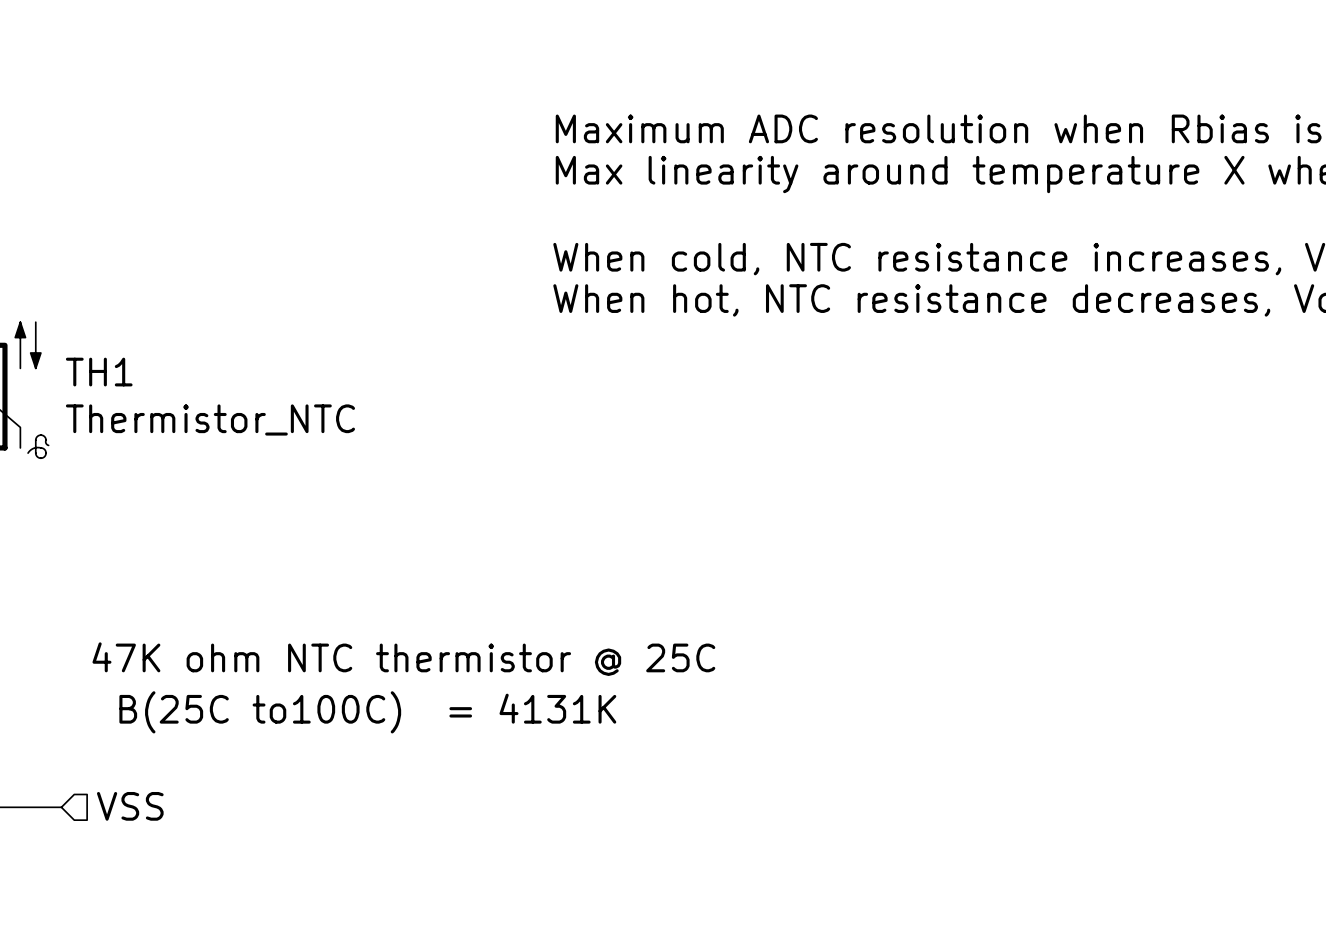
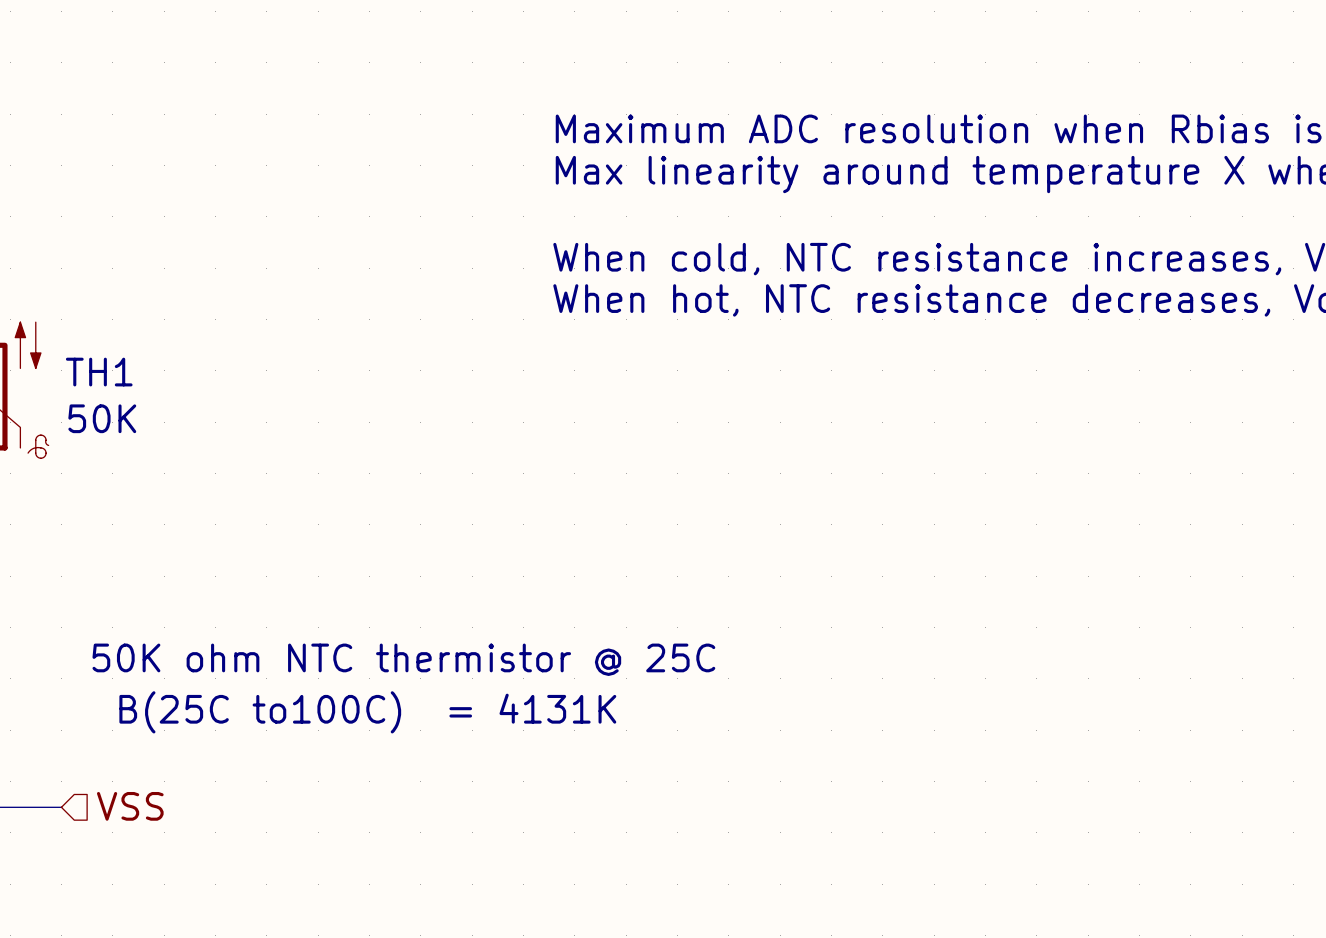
TH1 value: Thermistor_NTC (210, 419) -> 50K (102, 418)
text: 47K ohm NTC thermistor @ 25C (403, 659) -> 50K ohm NTC thermistor @ 25C (403, 659)

